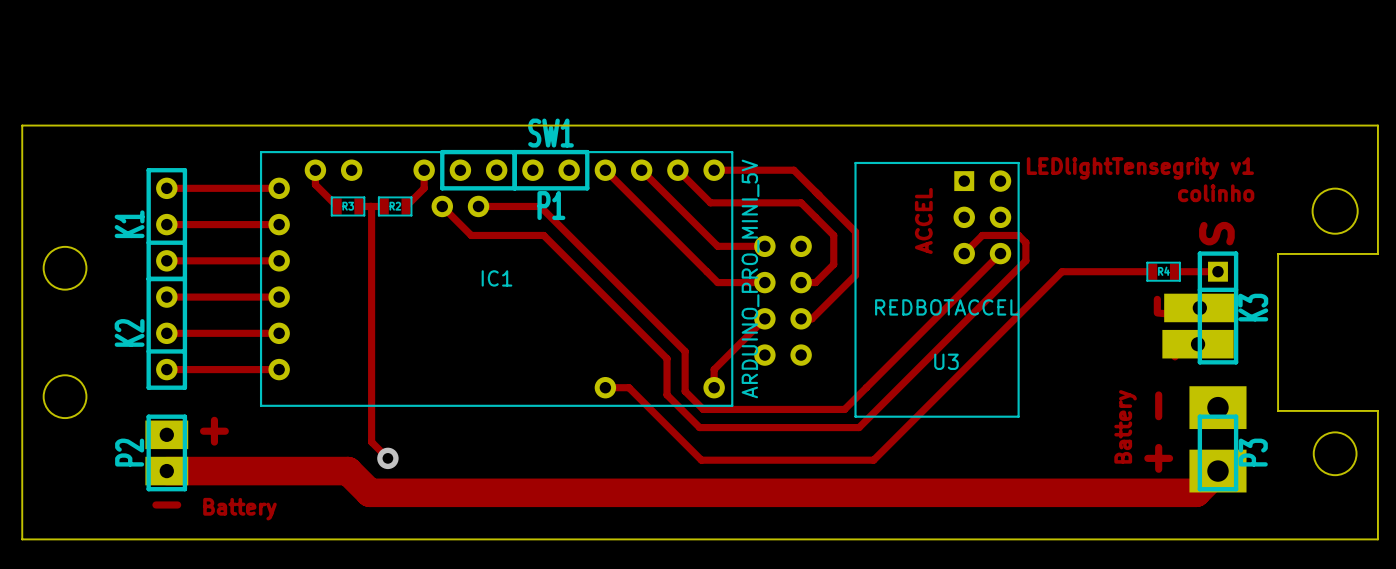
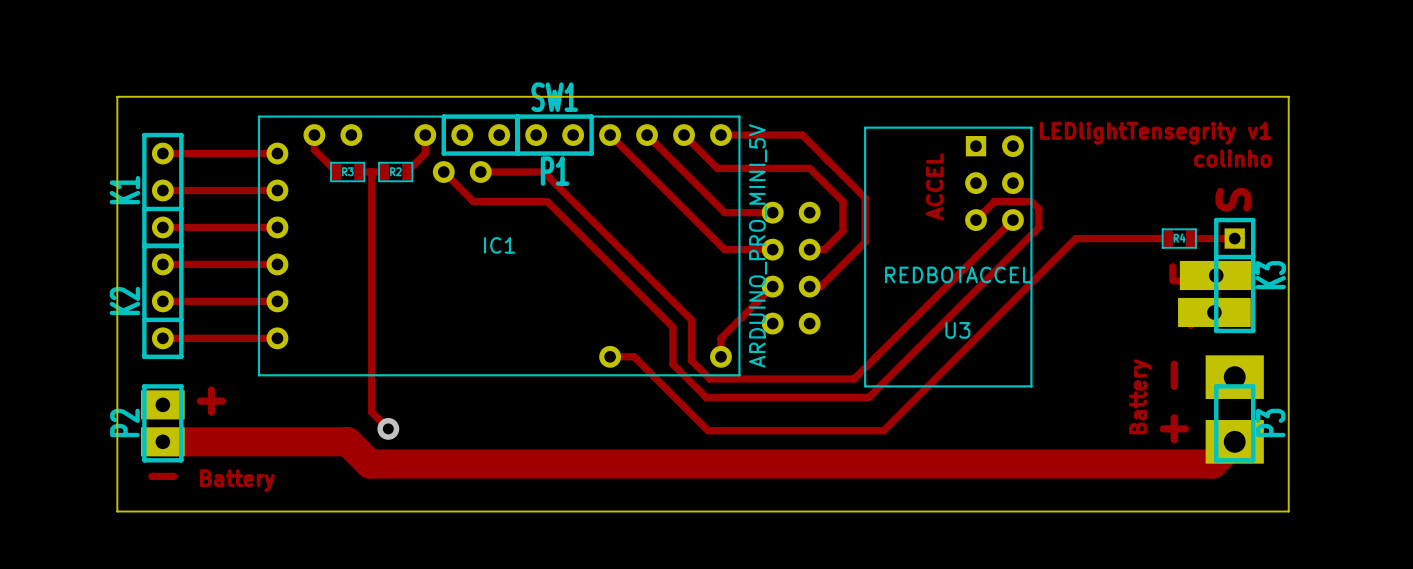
round board edge: [1311, 187, 1359, 235] -> none
round board edge: [42, 246, 88, 291] -> none
round board edge: [42, 374, 88, 419] -> none
round board edge: [1313, 431, 1358, 476] -> none
board edge: (122, 539) (22, 539) (22, 125) (1377, 125) (1377, 253) (1278, 253) (1278, 410) (1377, 410) (1377, 539) (1270, 539) -> (117, 511) (117, 96) (1288, 96) (1288, 511)

